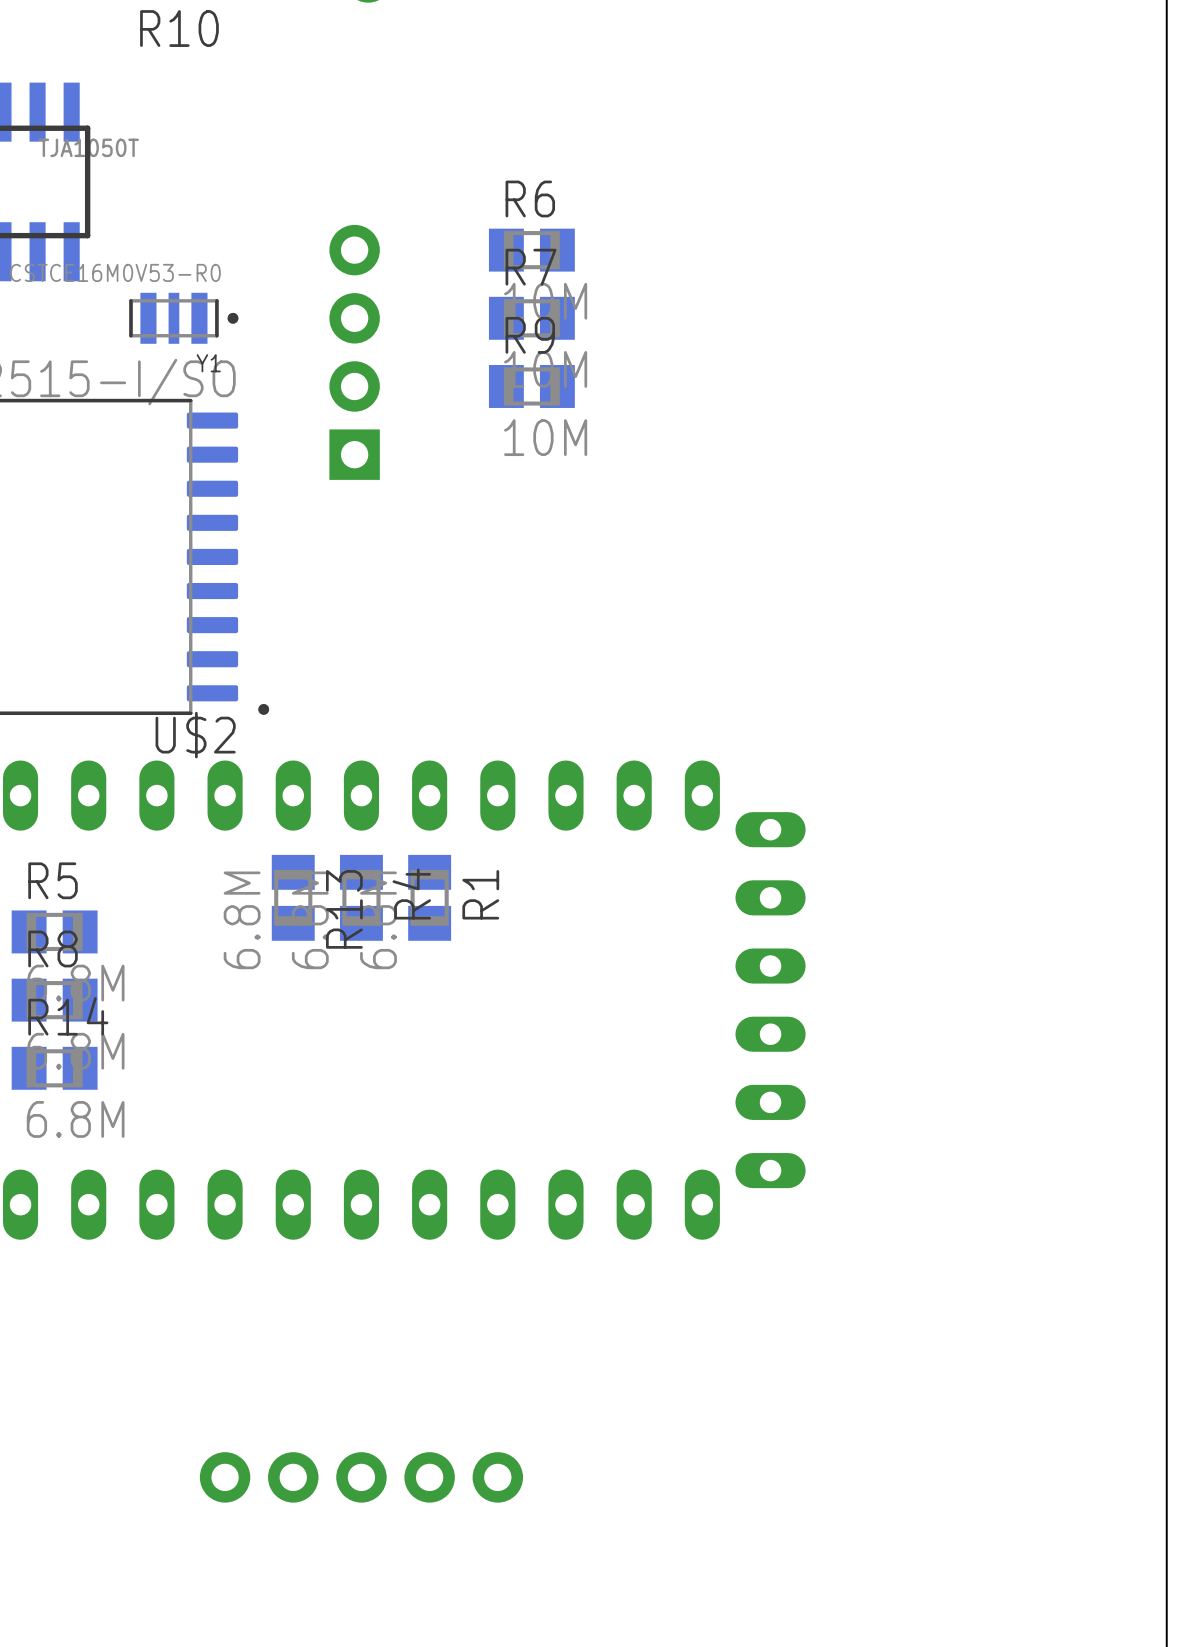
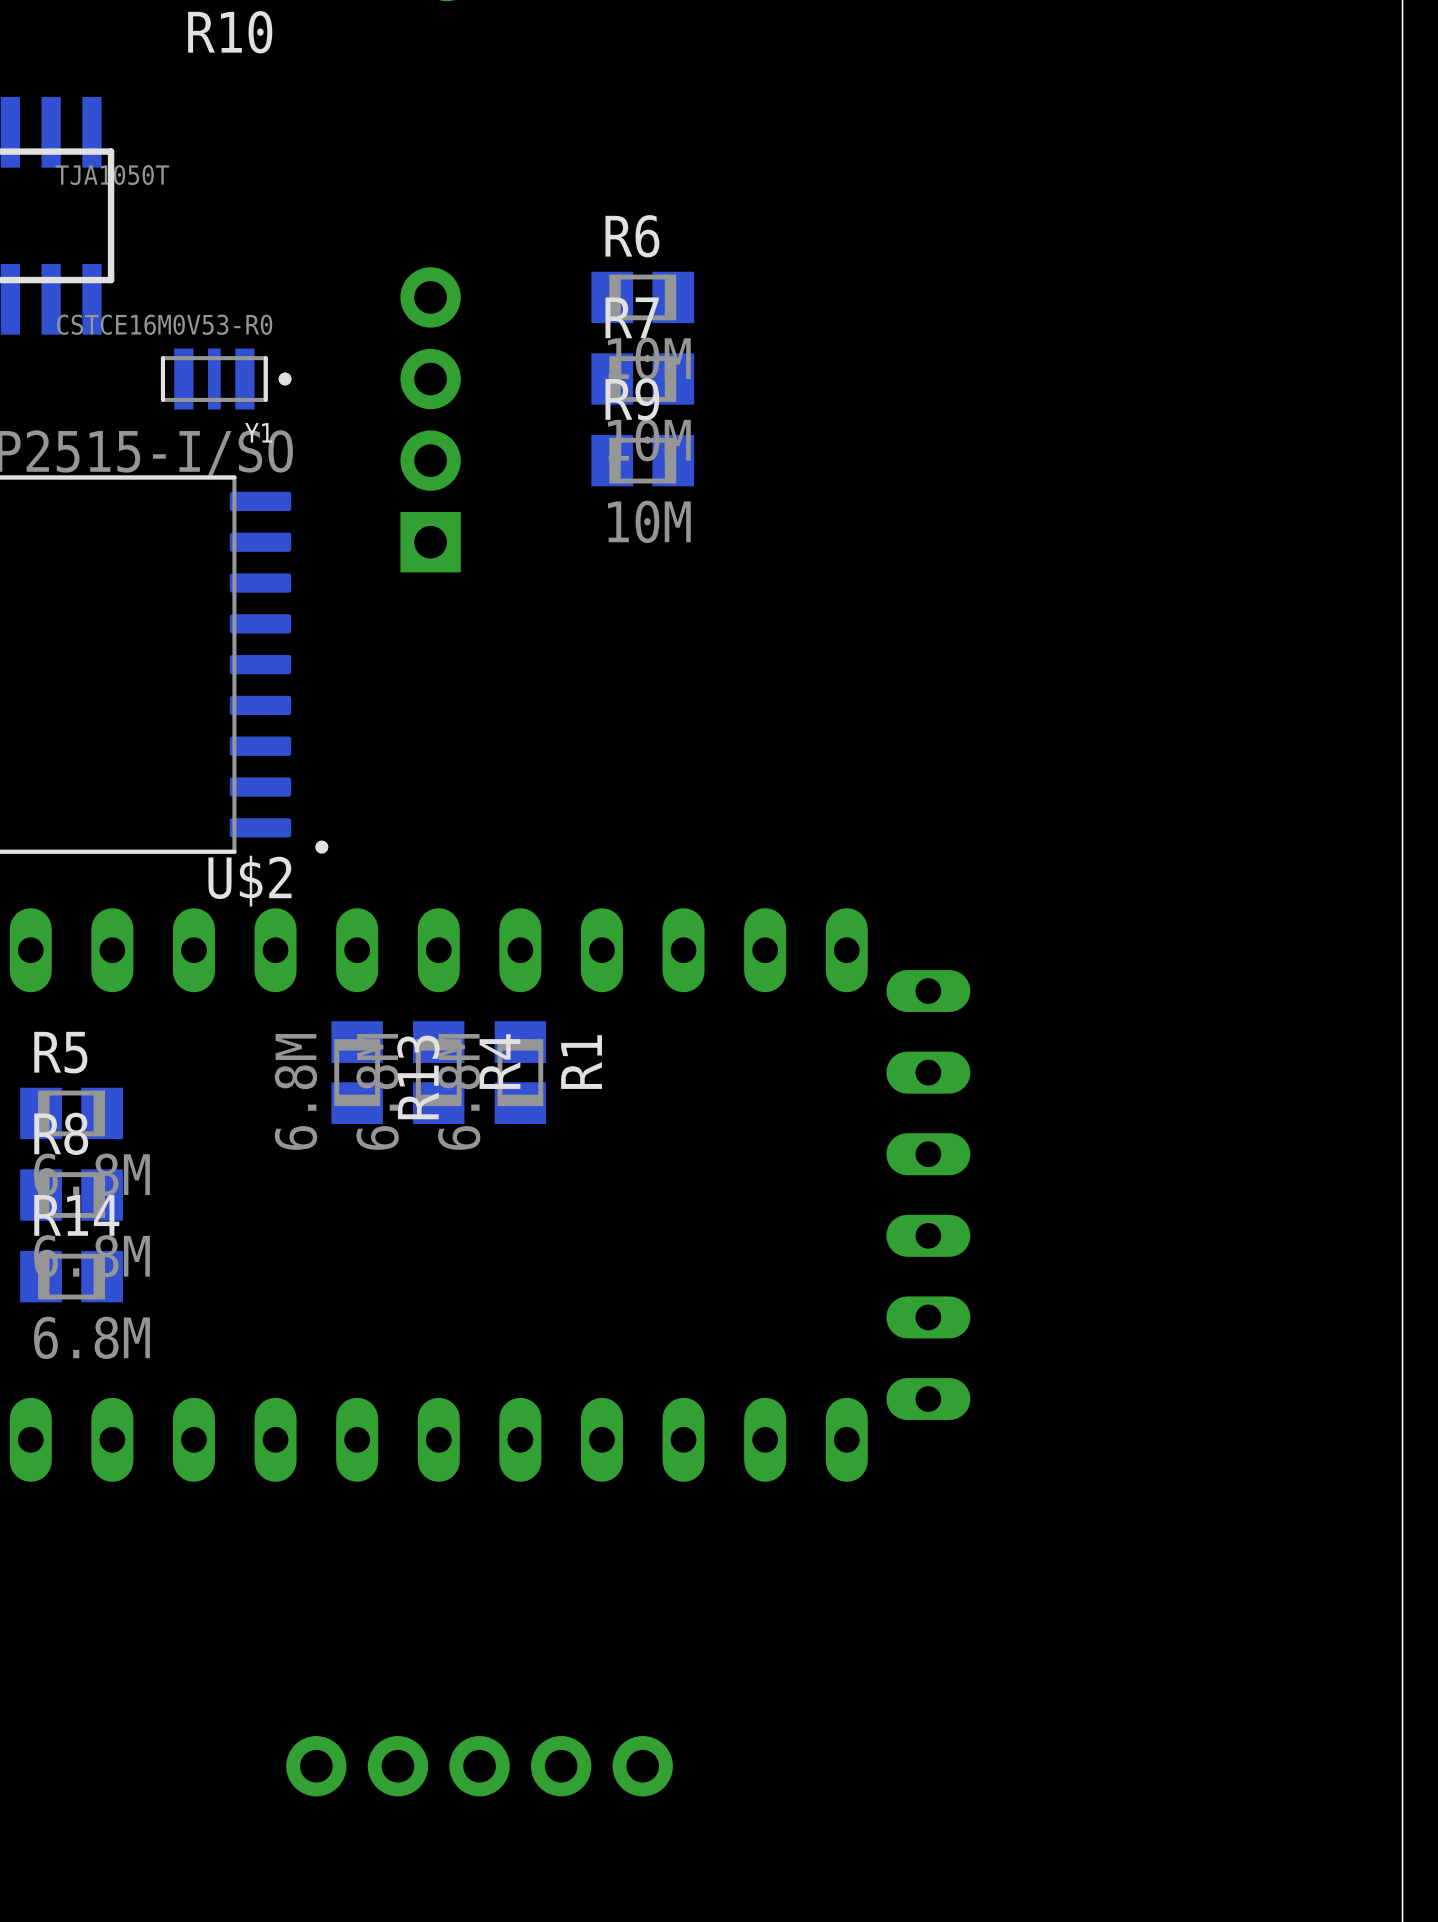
part position: (361, 1477) -> (479, 1766)

